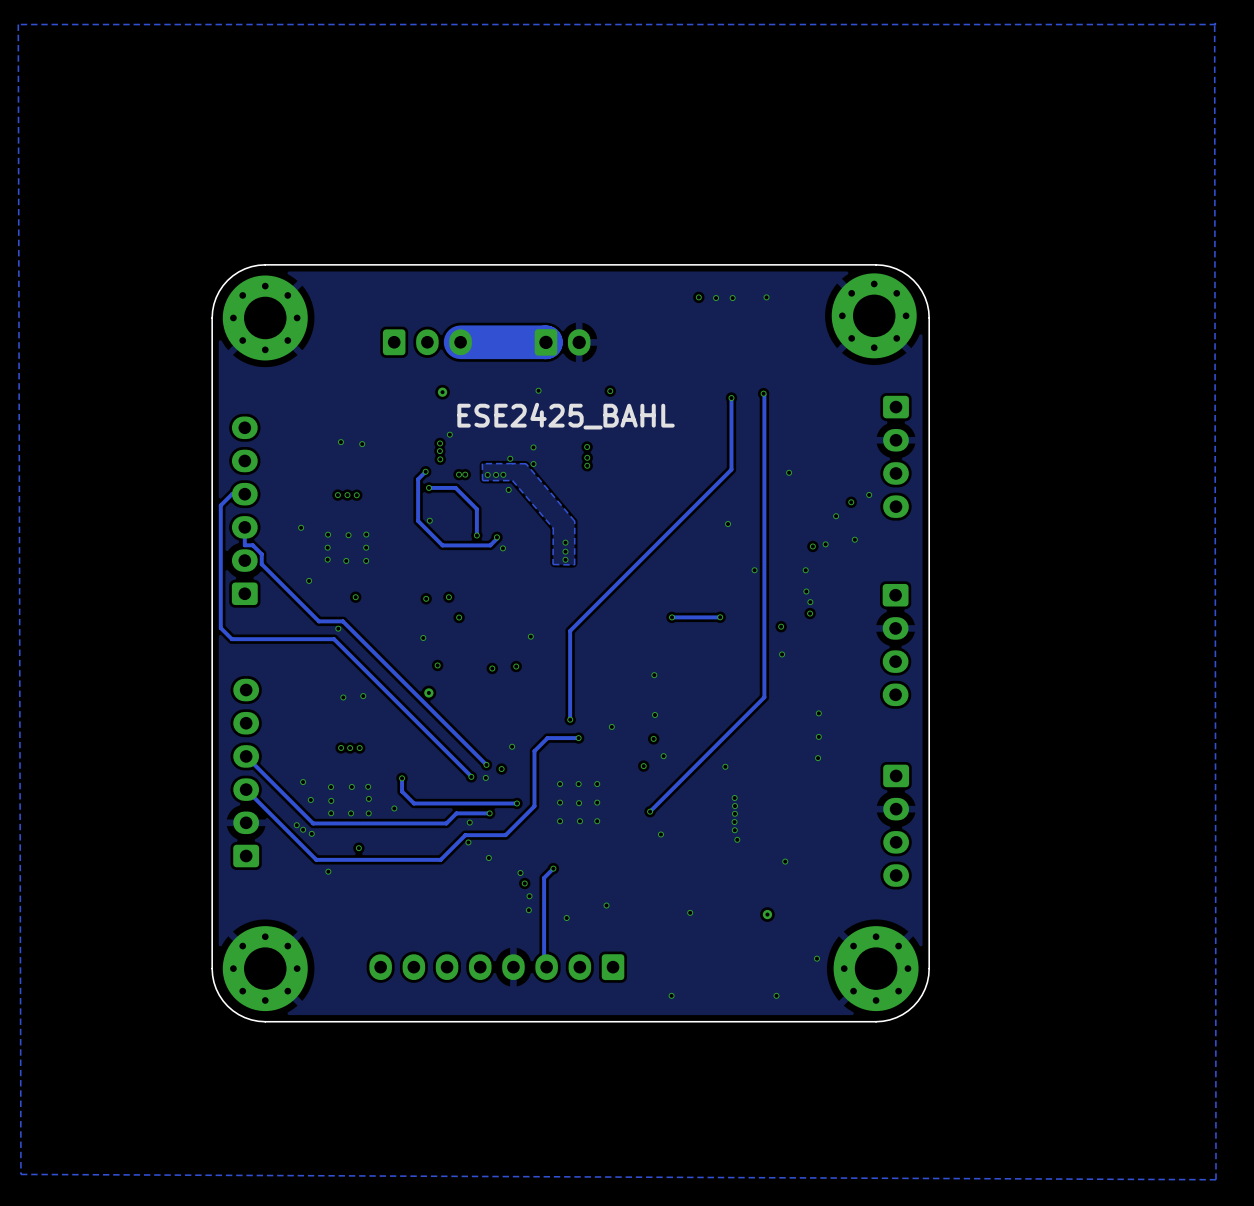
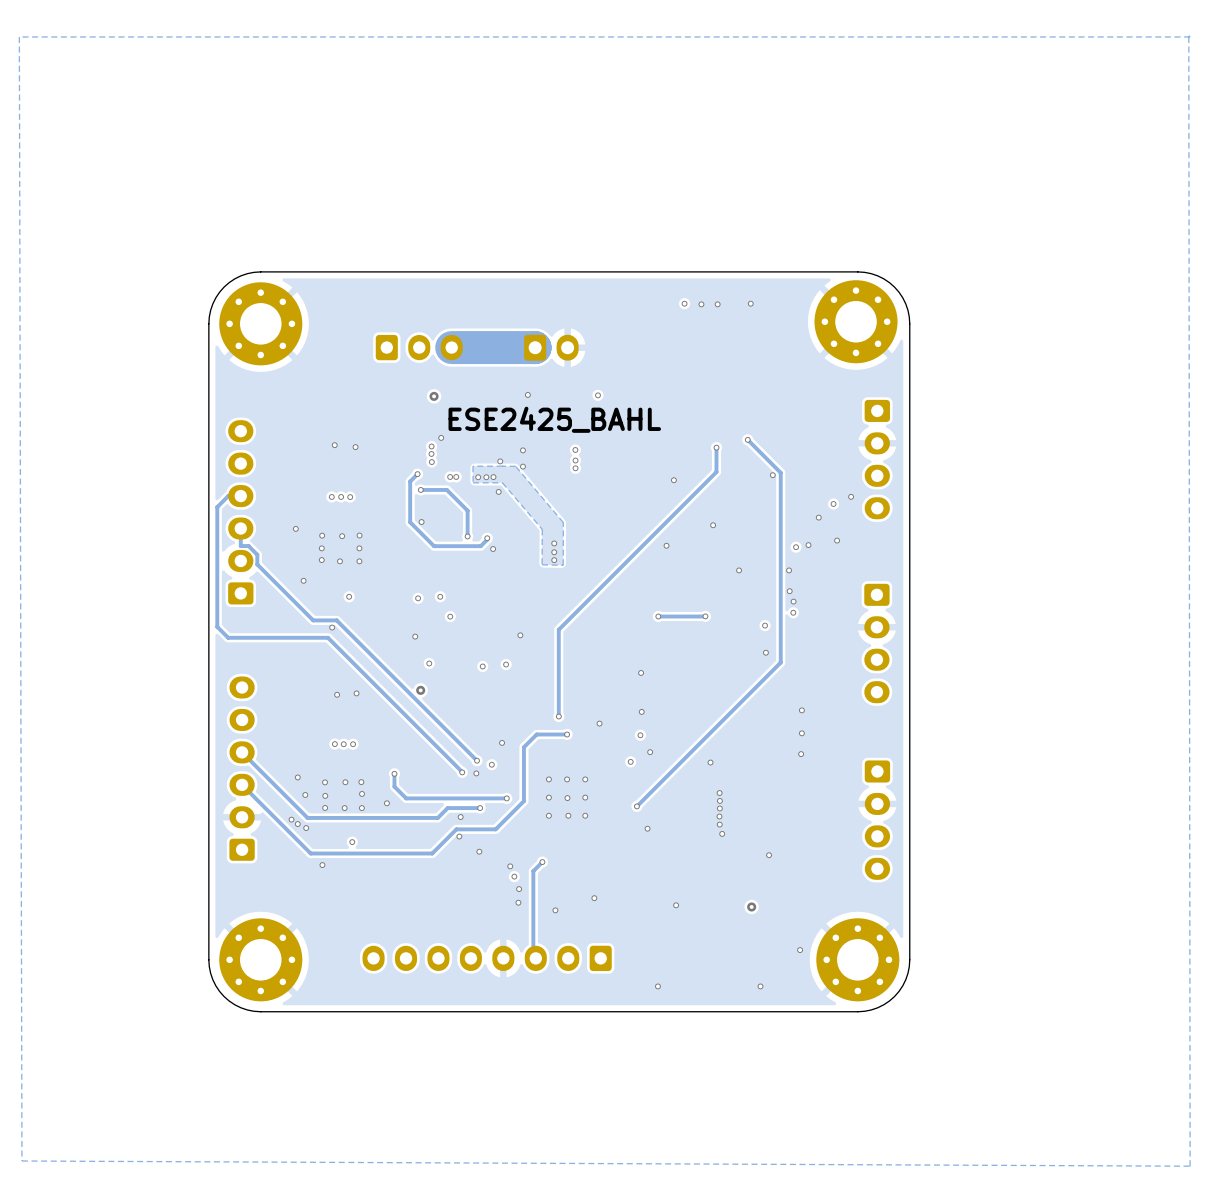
track: (763, 393) (764, 697) -> (747, 439) (780, 472) (780, 662) (748, 694)
via: (763, 393) -> none
track: (731, 398) (731, 444) -> none
via: (731, 398) -> none
via: none -> (747, 439)
via: none -> (716, 447)
via: none -> (673, 480)
via: none -> (666, 545)

